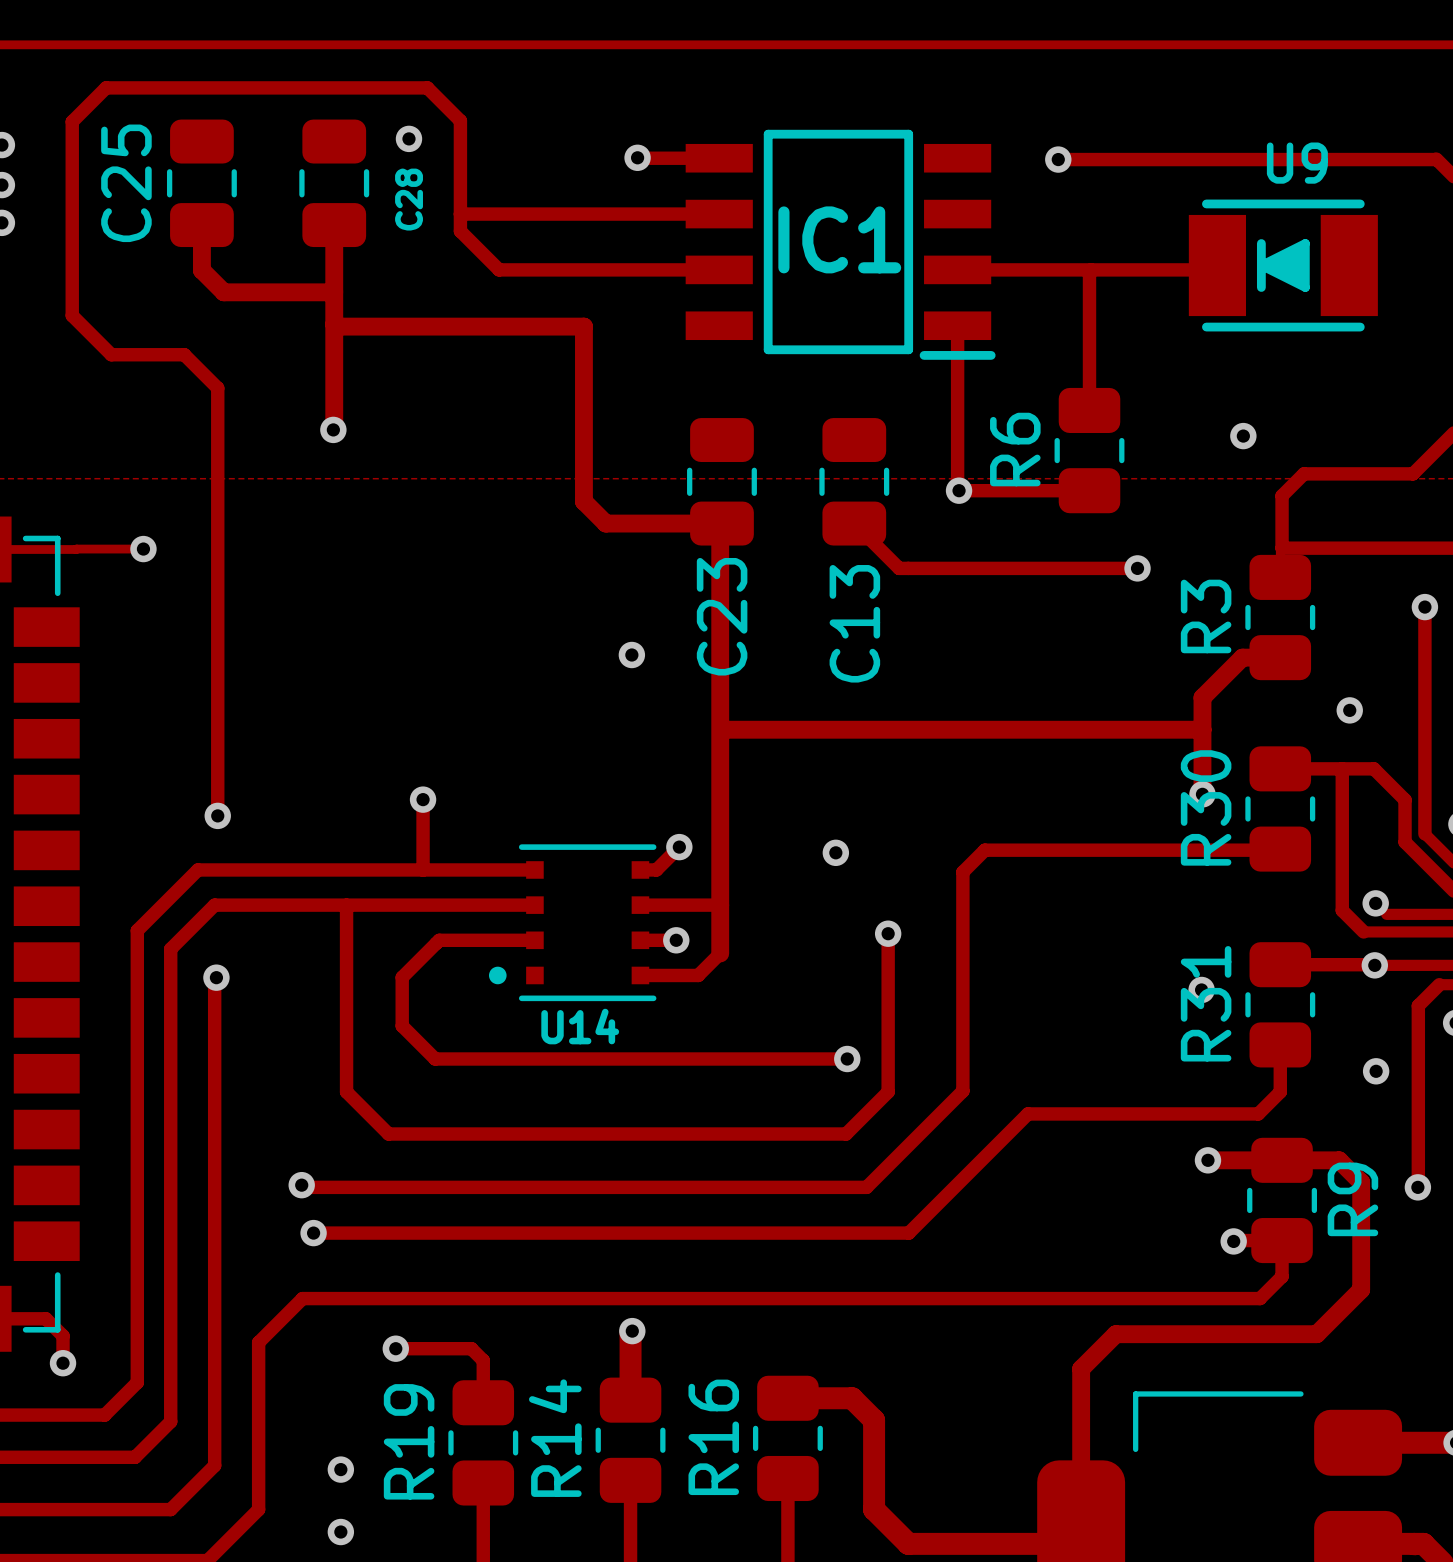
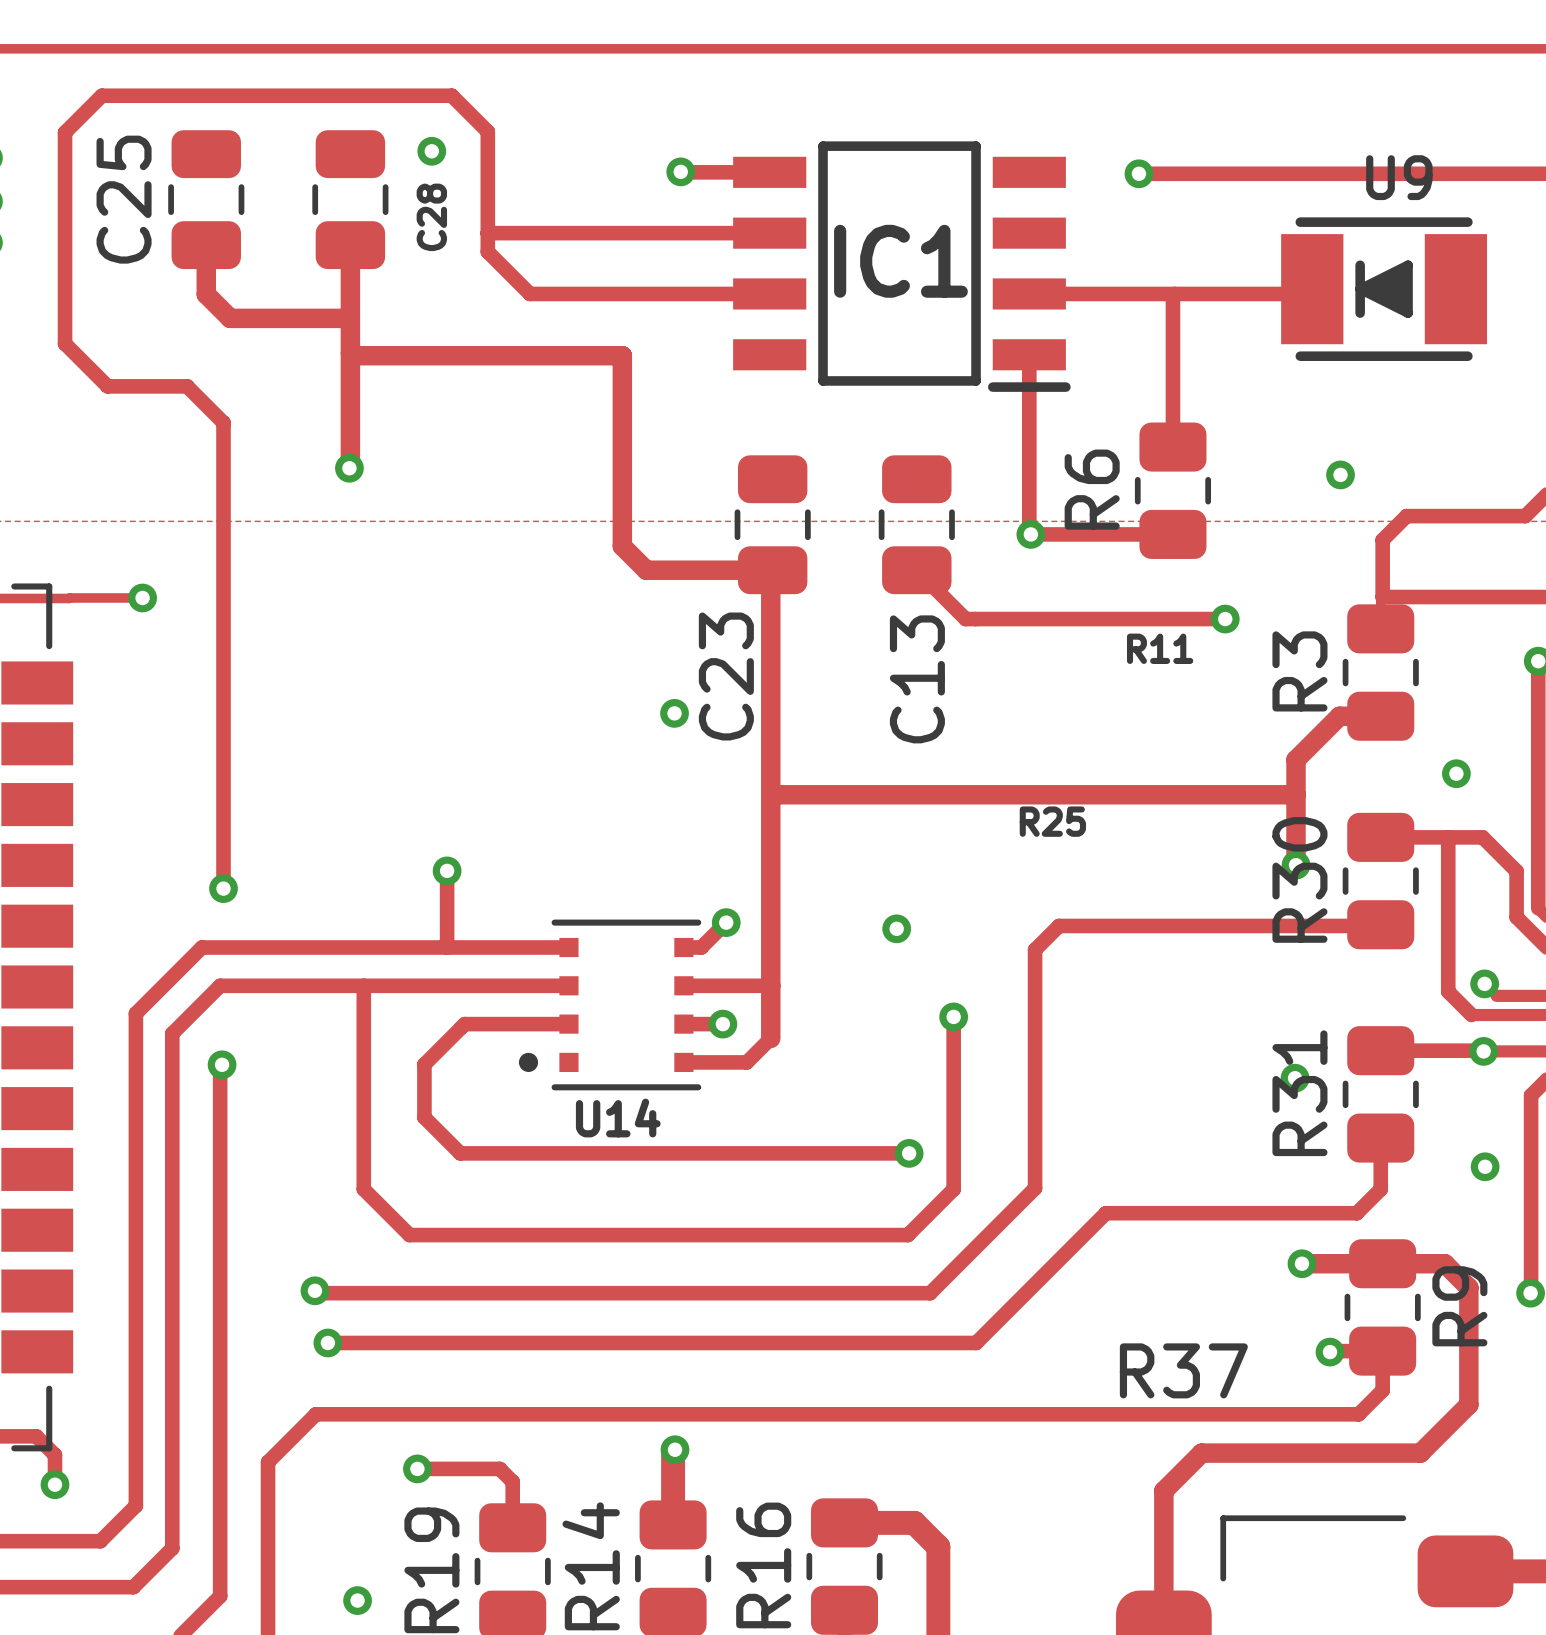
R11: none -> (1160, 648)
C23 name position: C23 (722, 616) -> C23 (726, 676)
R25: none -> (1052, 821)
R37: none -> (1183, 1370)

